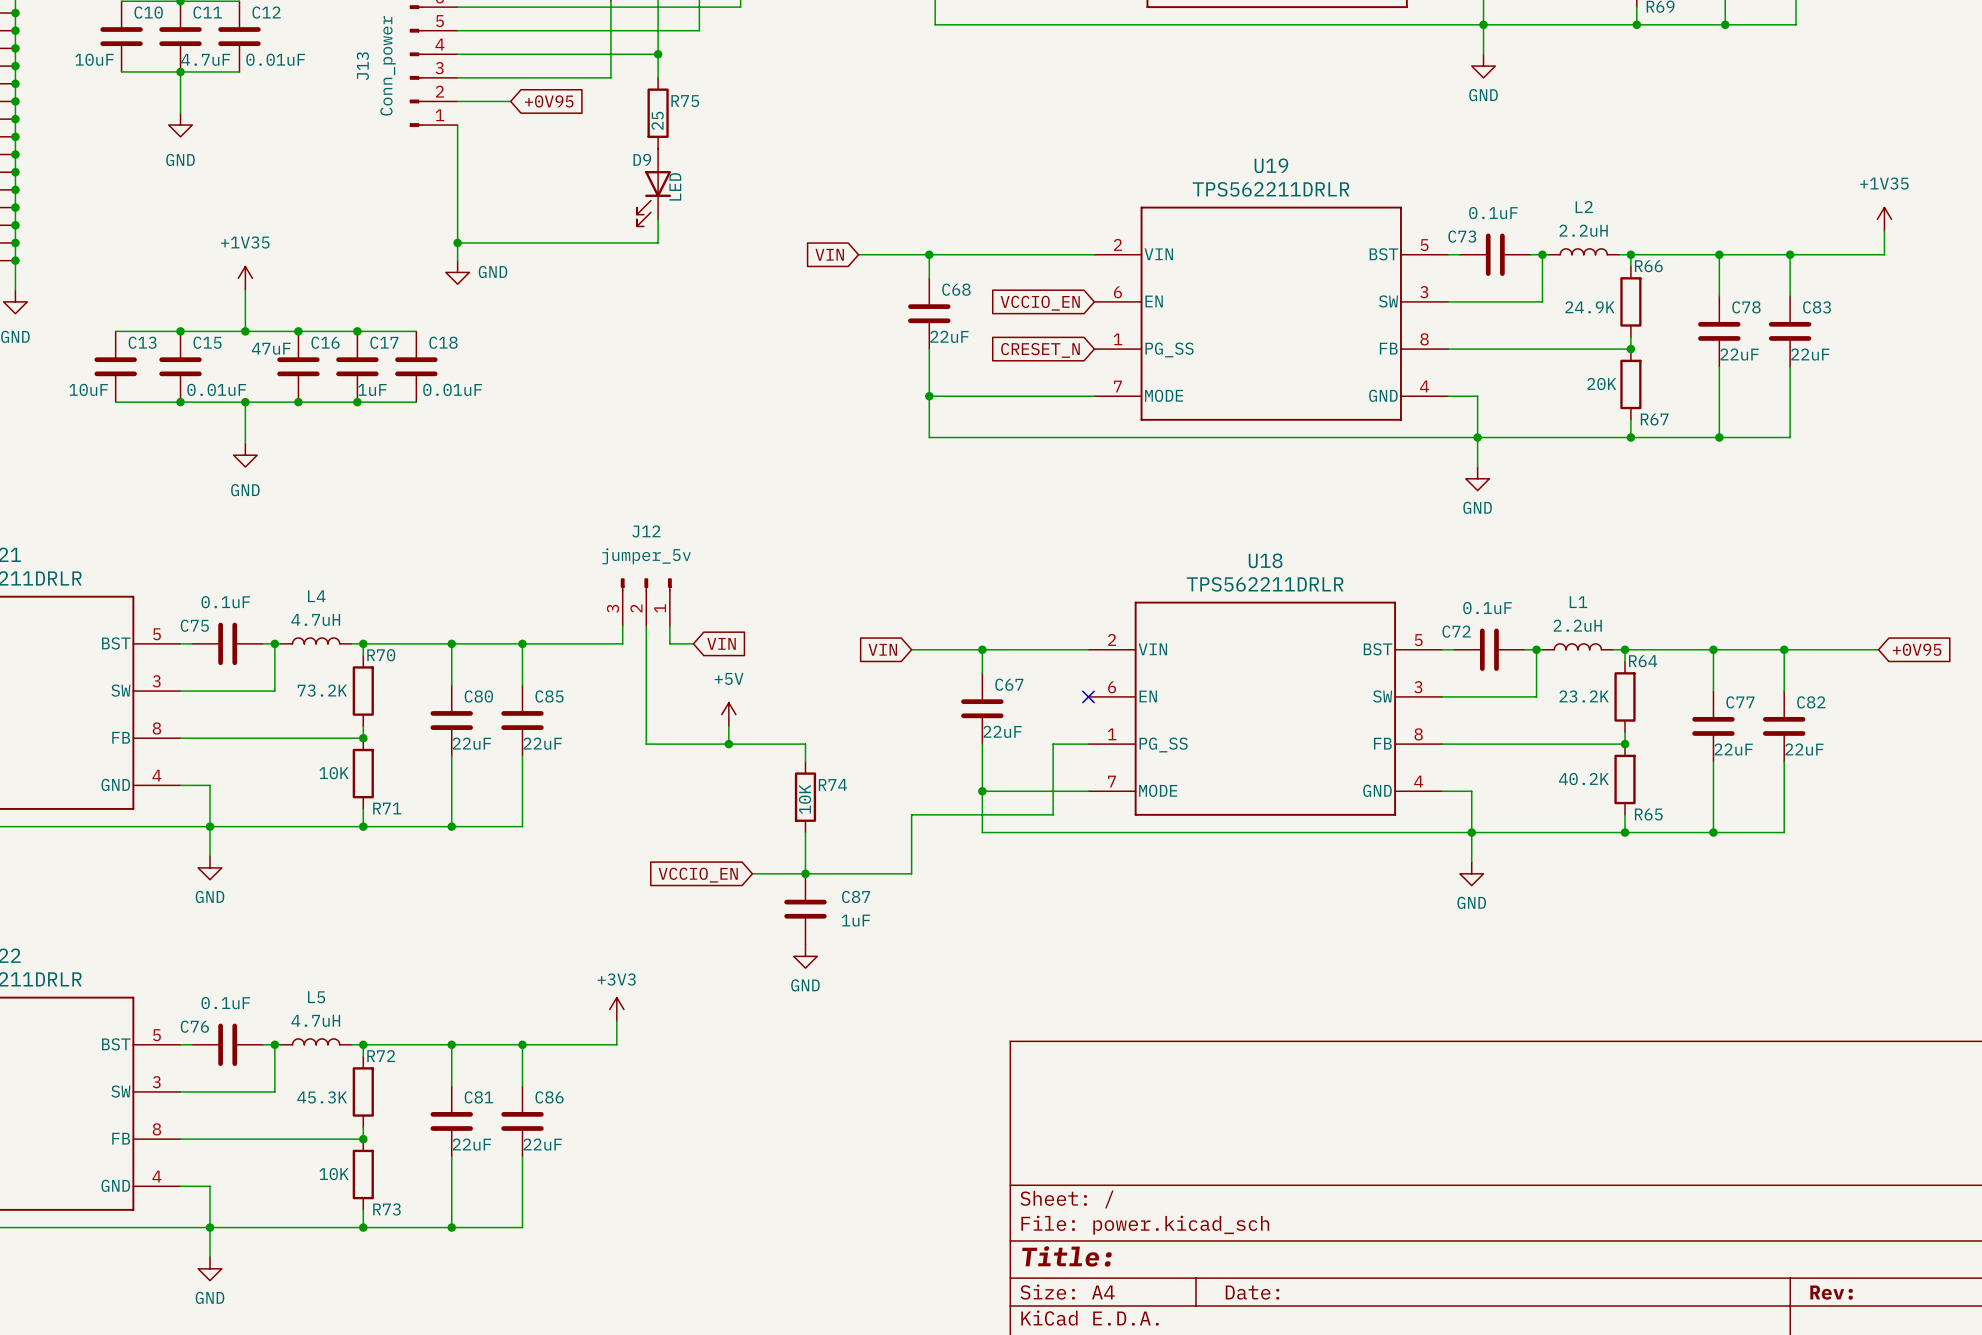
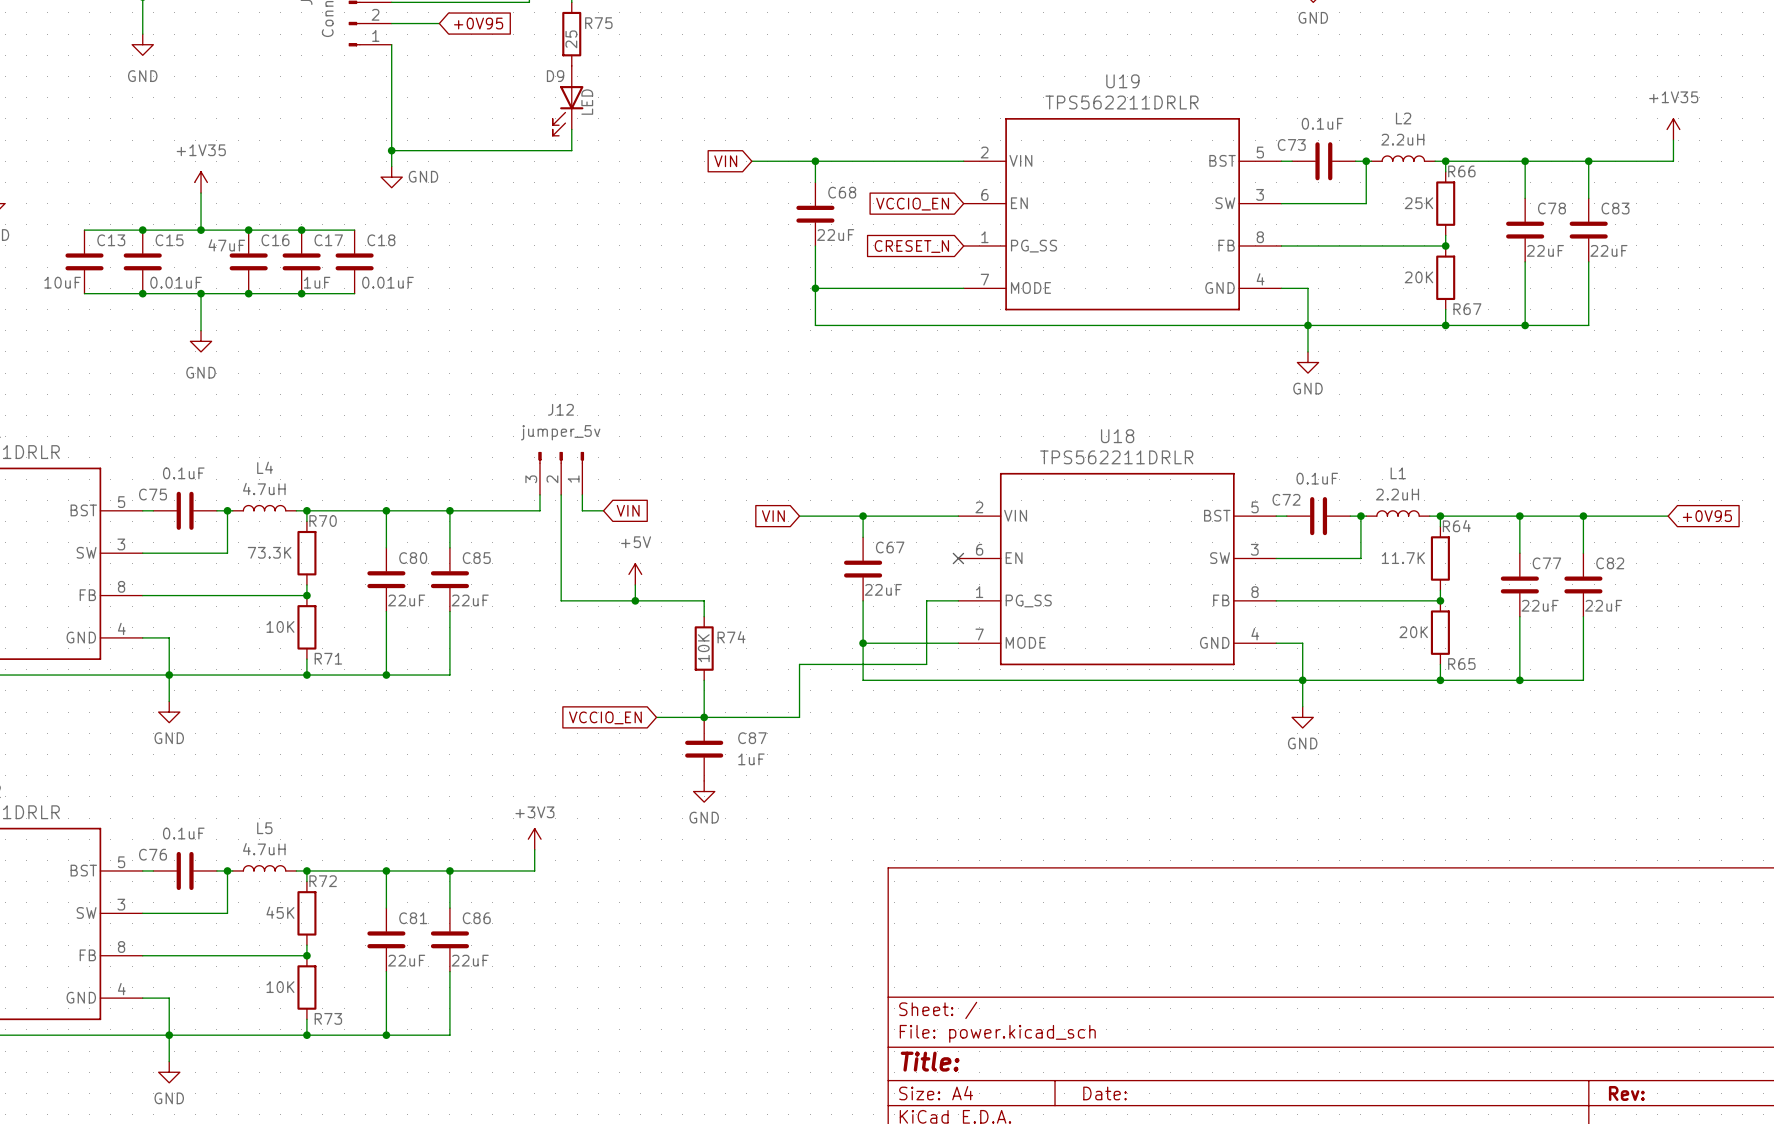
R66 value: 24.9K (1590, 307) -> 25K (1418, 203)
R70 value: 73.2K (322, 690) -> 73.3K (269, 552)
R64 value: 23.2K (1584, 696) -> 11.7K (1403, 558)
R65 value: 40.2K (1583, 779) -> 20K (1413, 632)
R72 value: 45.3K (322, 1097) -> 45K (280, 912)

